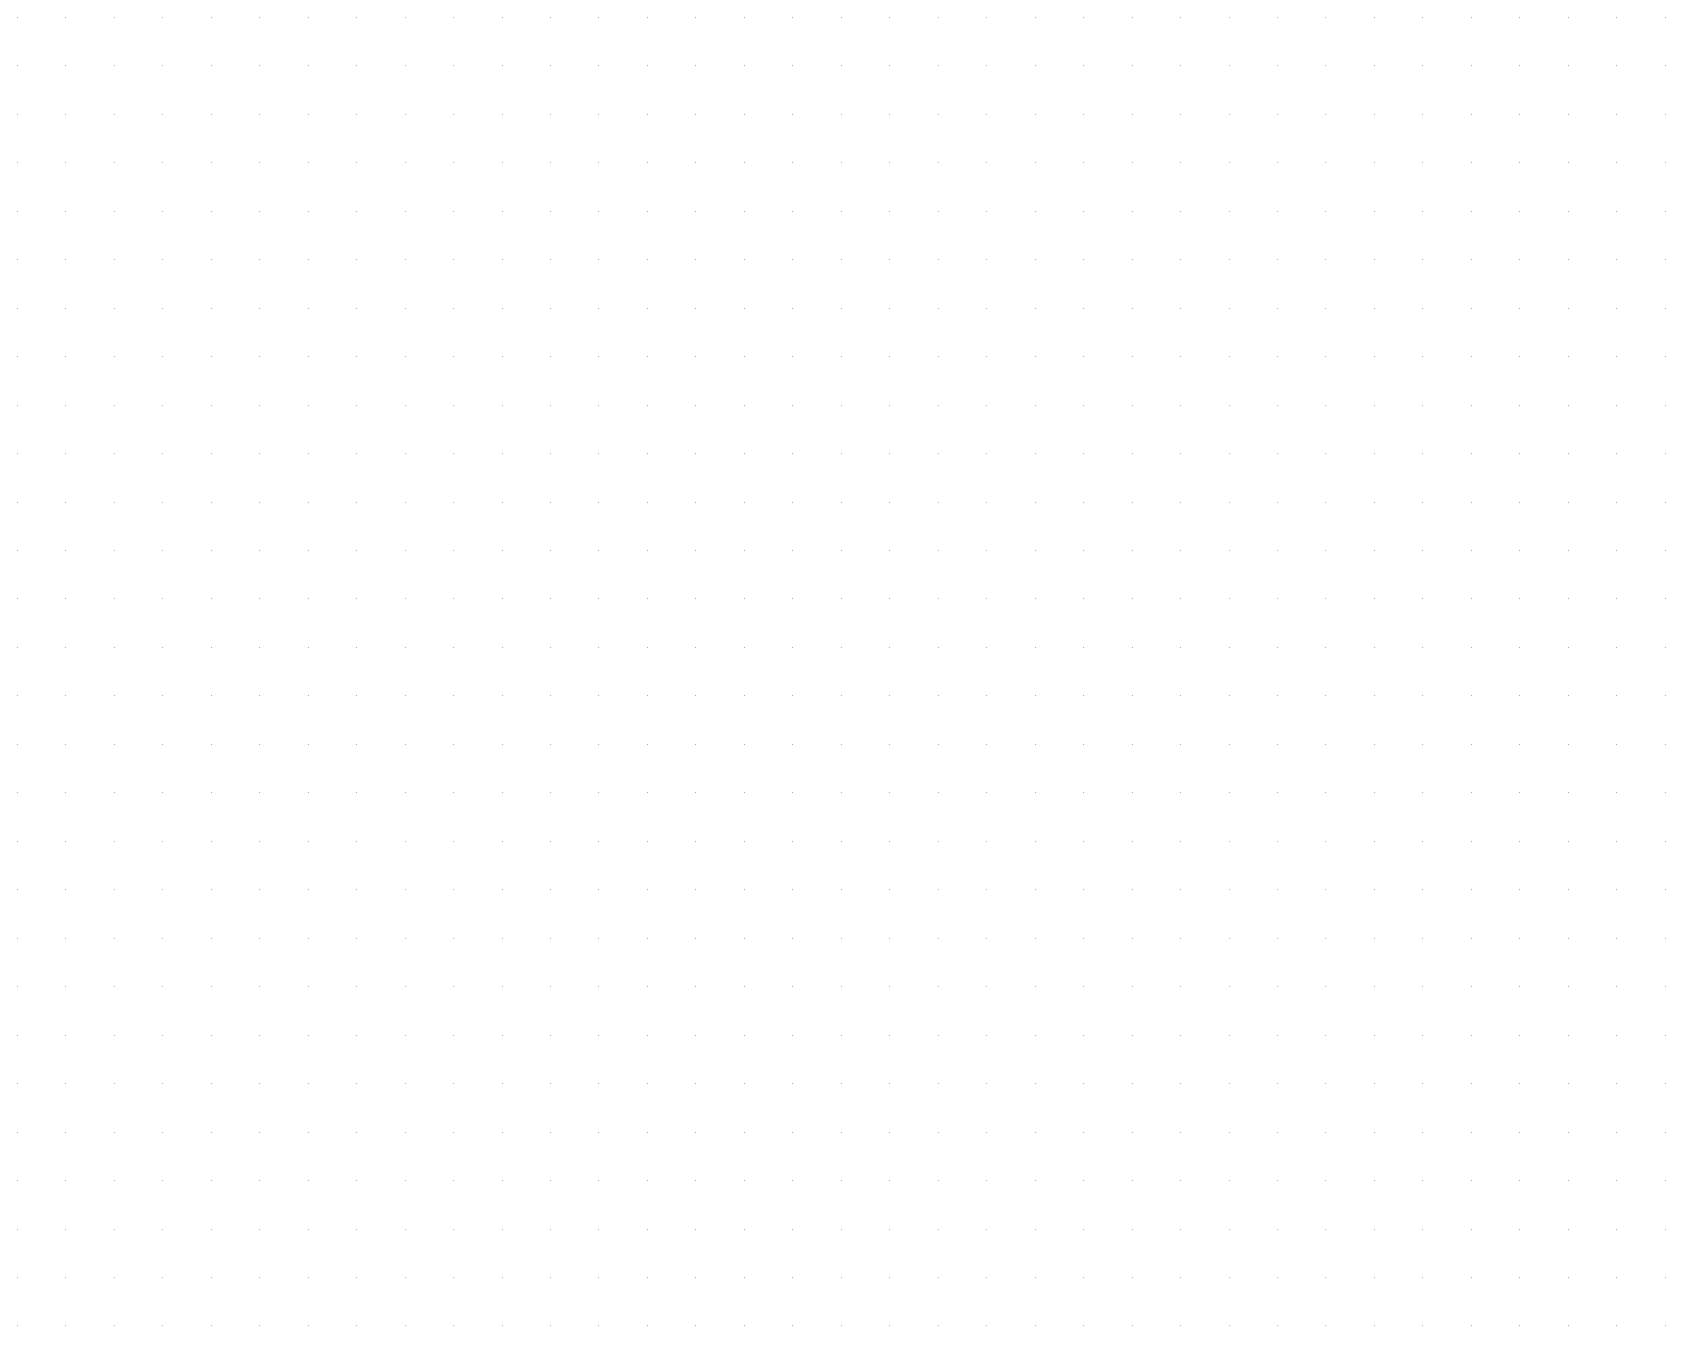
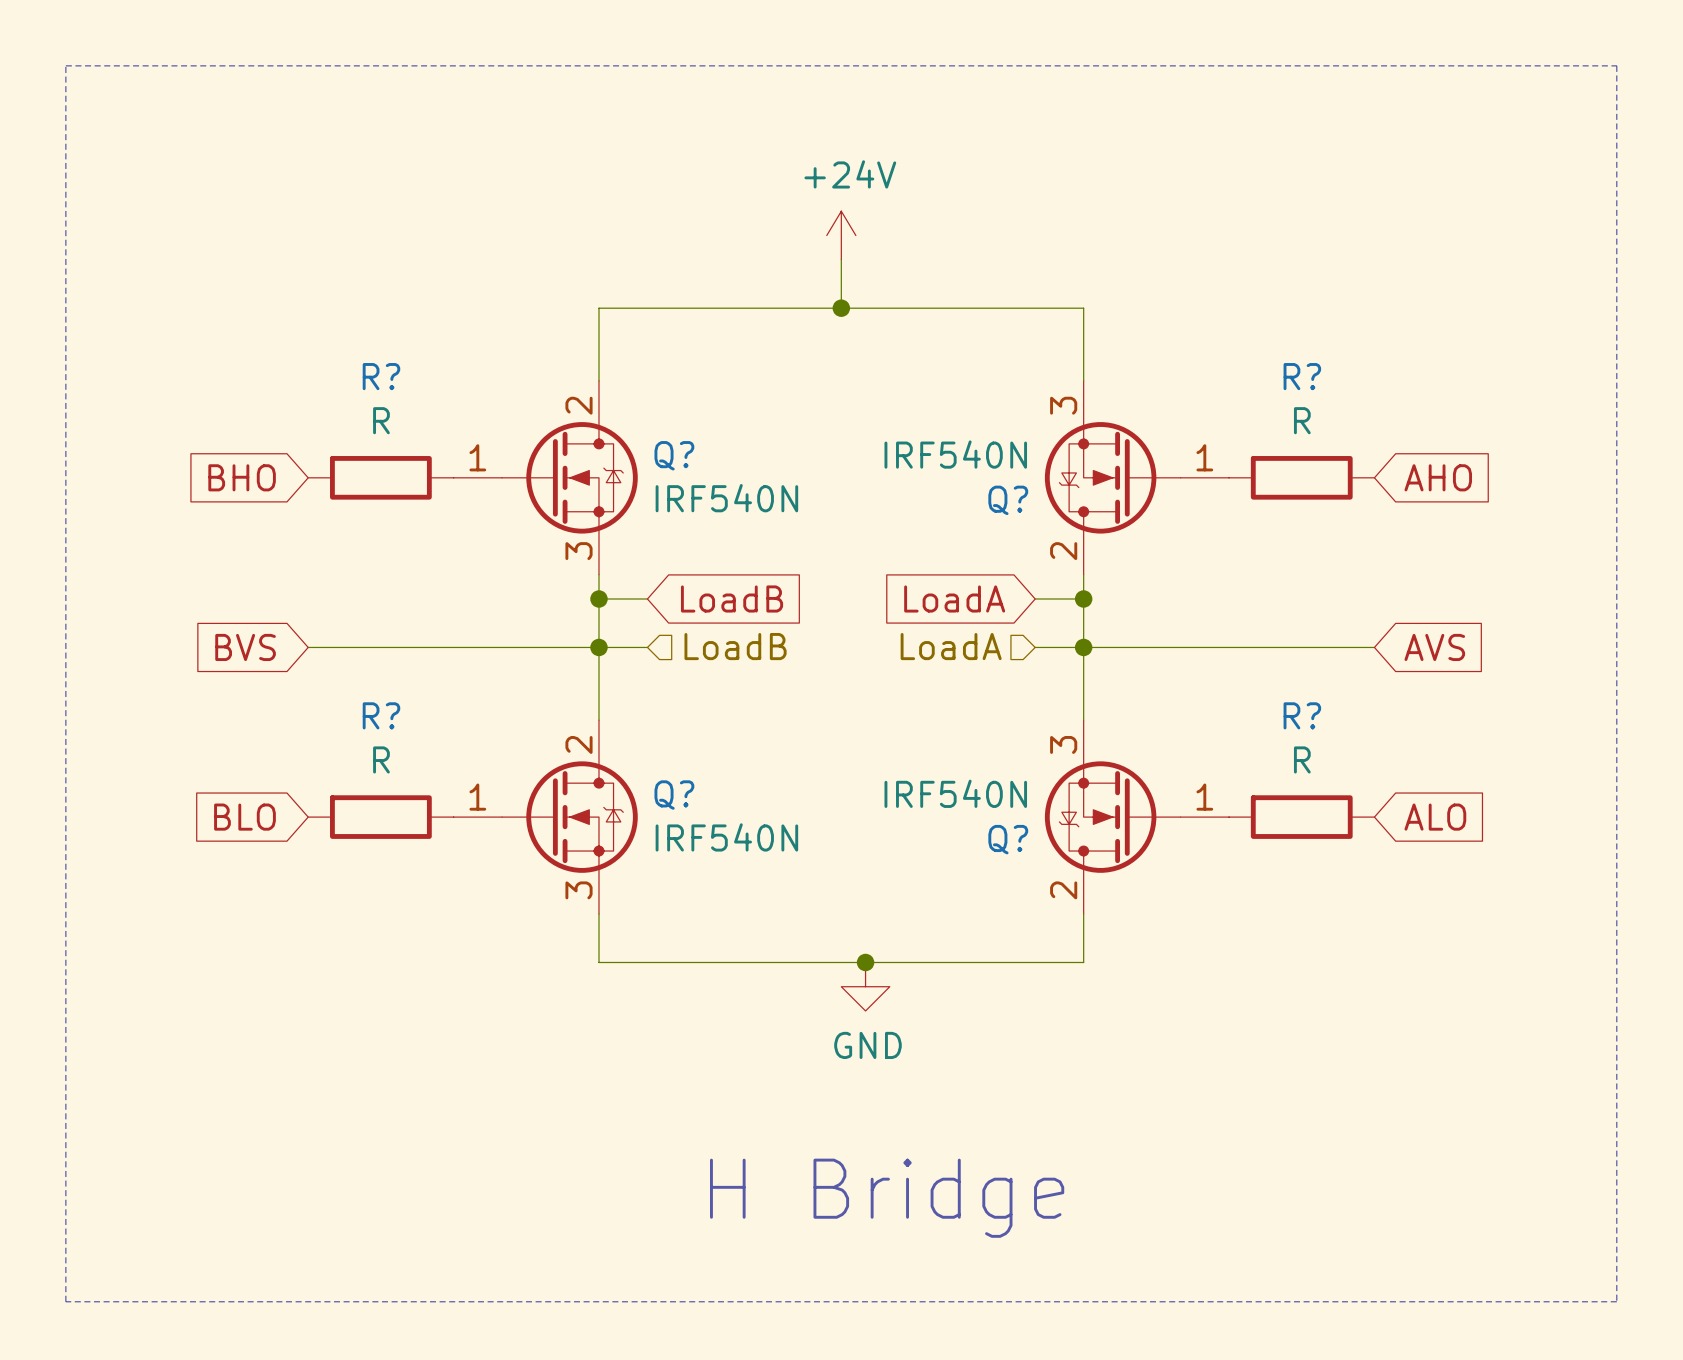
line: none -> (65, 65) (1616, 65) (1616, 1301) (65, 1301) (65, 65)
power symbol: none -> +24V (841, 235)
wire: none -> (841, 259) (841, 308)
junction: none -> (841, 308)
wire: none -> (598, 380) (598, 308) (1083, 308) (1083, 380)
global label: none -> BHO (242, 477)
R?: none -> R (380, 477)
Q?: none -> IRF540N (545, 477)
Q?: none -> IRF540N (1136, 477)
R?: none -> R (1301, 477)
global label: none -> AHO (1438, 477)
wire: none -> (598, 574) (598, 720)
wire: none -> (1083, 574) (1083, 720)
wire: none -> (598, 598) (647, 598)
junction: none -> (598, 598)
global label: none -> LoadB (732, 598)
global label: none -> LoadA (954, 598)
wire: none -> (1035, 598) (1083, 598)
junction: none -> (1083, 598)
hierarchical label: none -> LoadB (735, 646)
hierarchical label: none -> LoadA (951, 646)
global label: none -> BVS (245, 647)
wire: none -> (308, 647) (647, 647)
junction: none -> (598, 647)
wire: none -> (1035, 647) (1374, 647)
junction: none -> (1083, 647)
global label: none -> AVS (1434, 647)
global label: none -> BLO (244, 817)
R?: none -> R (380, 817)
Q?: none -> IRF540N (545, 817)
Q?: none -> IRF540N (1136, 817)
R?: none -> R (1301, 817)
global label: none -> ALO (1435, 817)
wire: none -> (598, 914) (598, 962) (1083, 962) (1083, 914)
junction: none -> (865, 962)
power symbol: none -> GND (865, 986)
text: none -> H Bridge (887, 1198)

